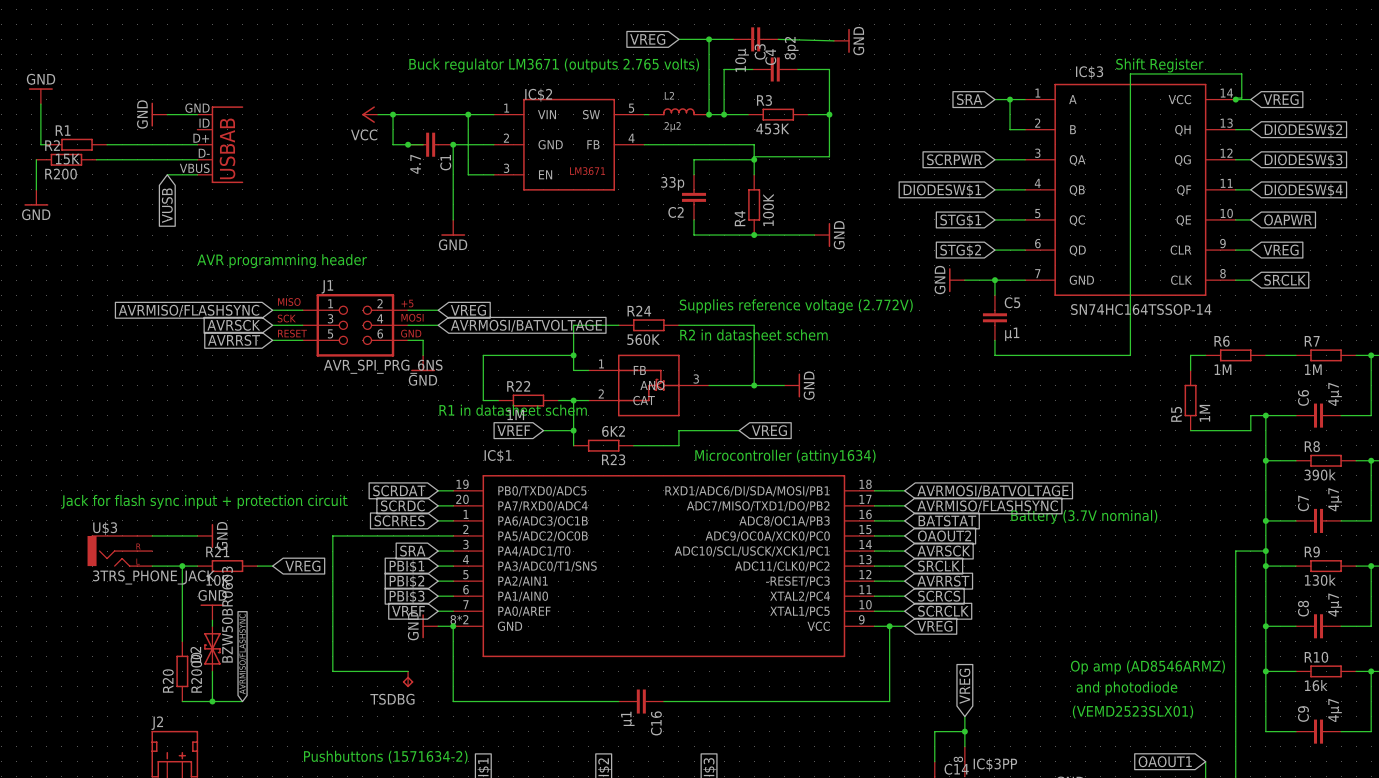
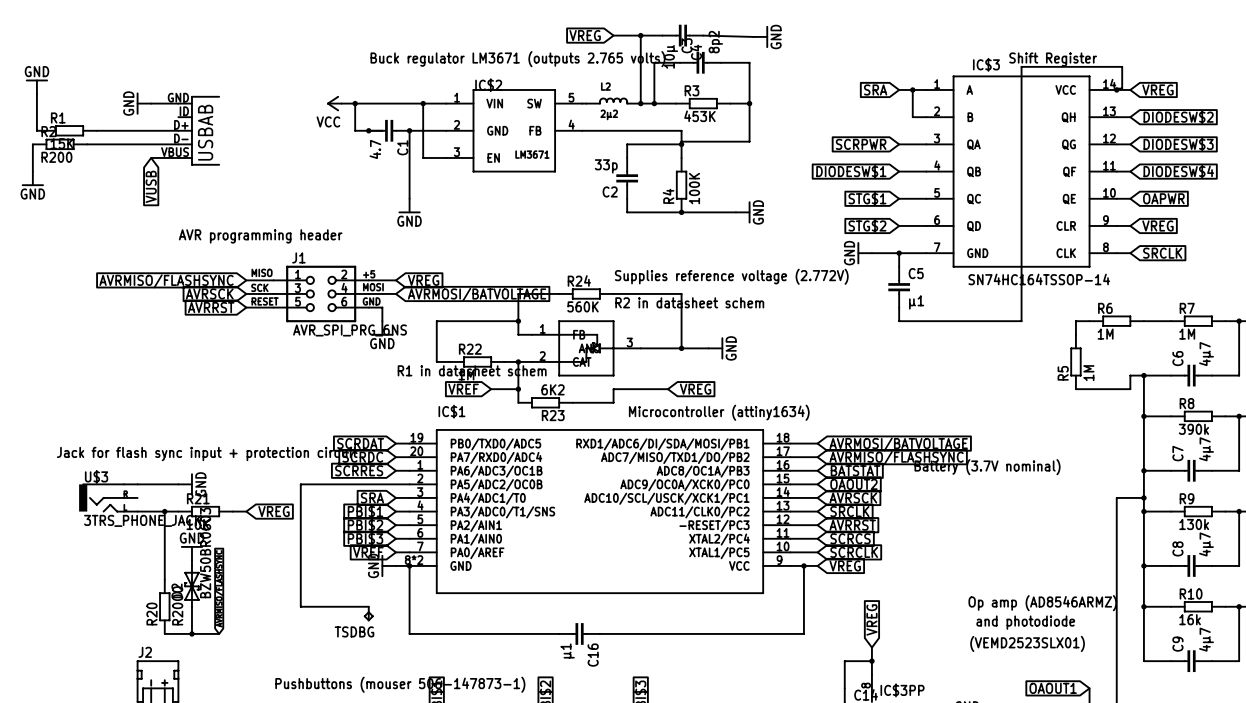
text: Pushbuttons (1571634-2) (385, 757) -> Pushbuttons (mouser 506-147873-1) (400, 684)

